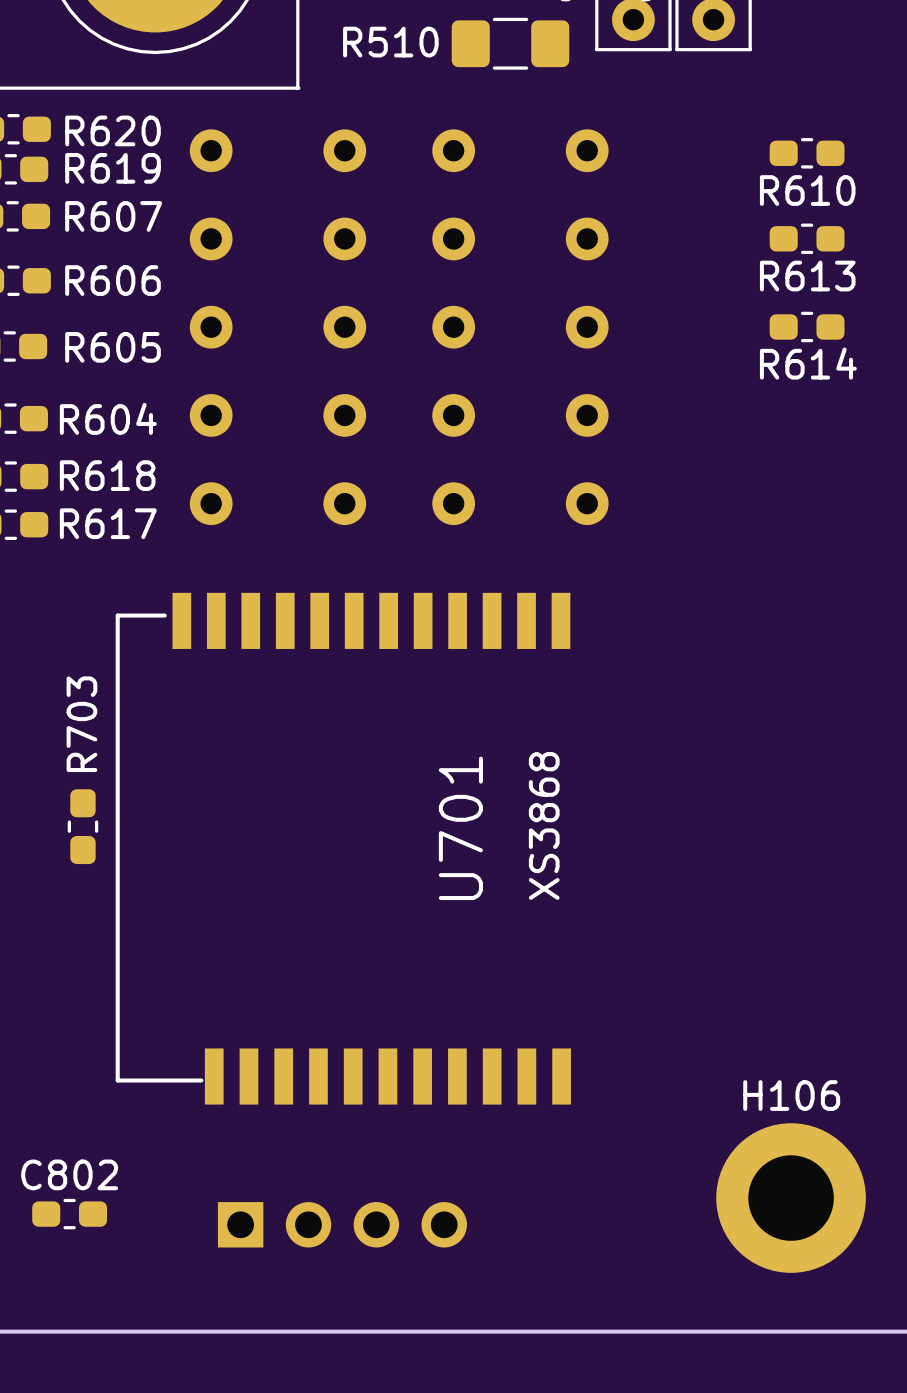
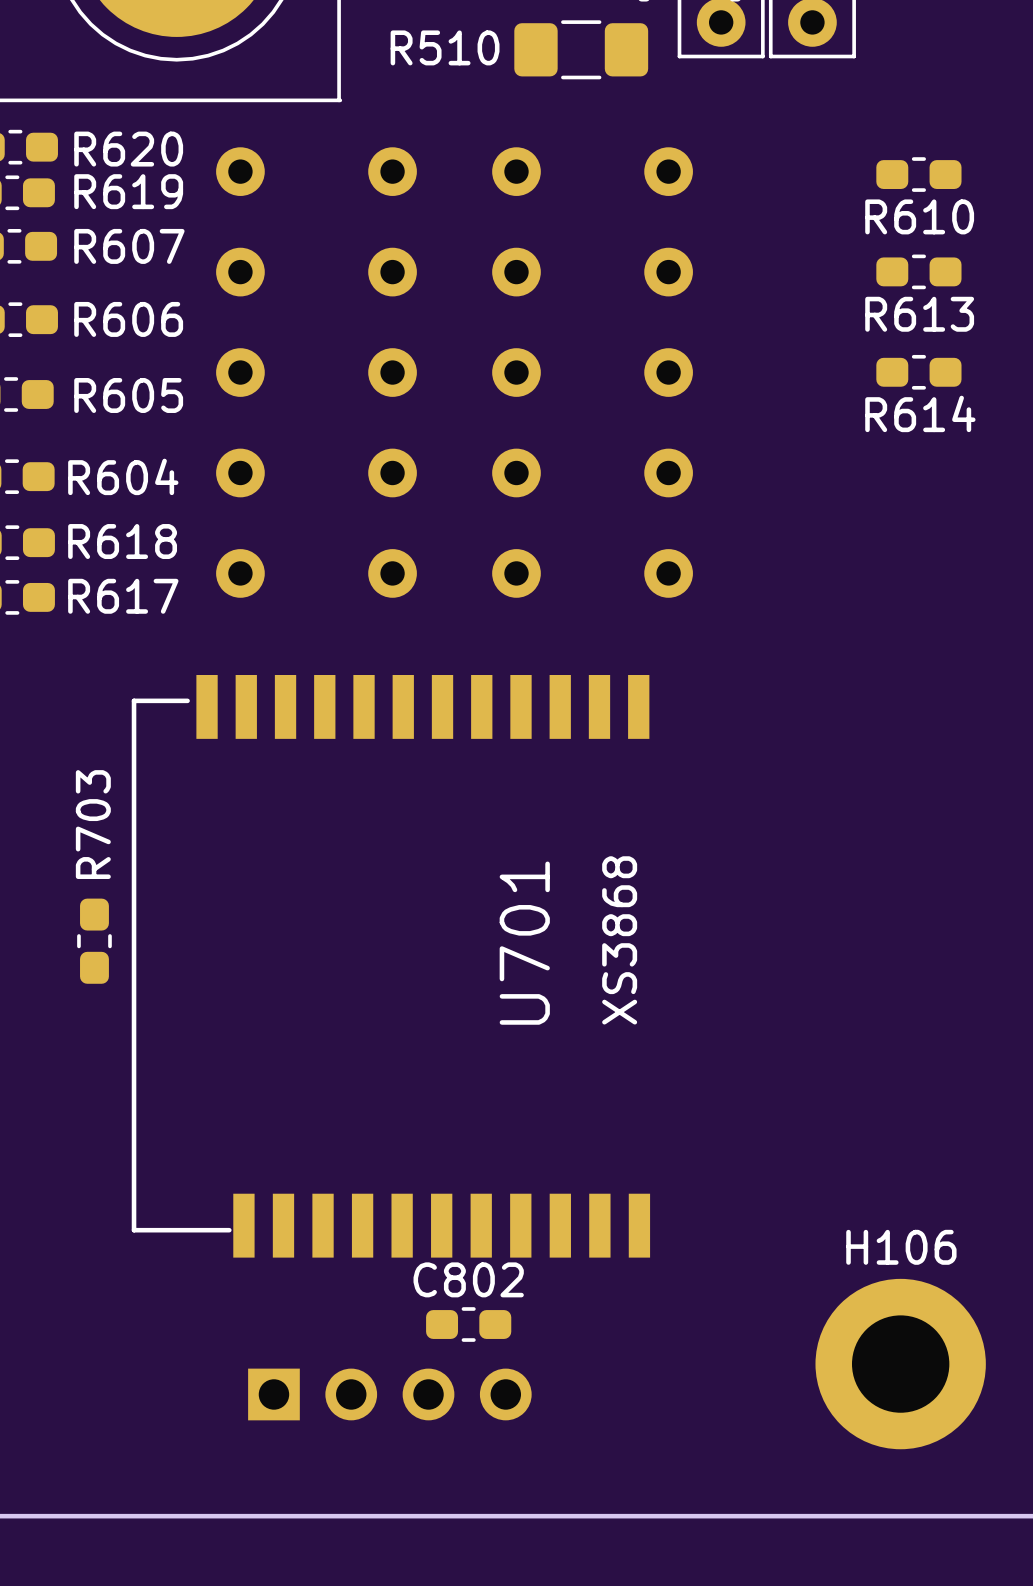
C802 position: (69, 1214) -> (468, 1324)

